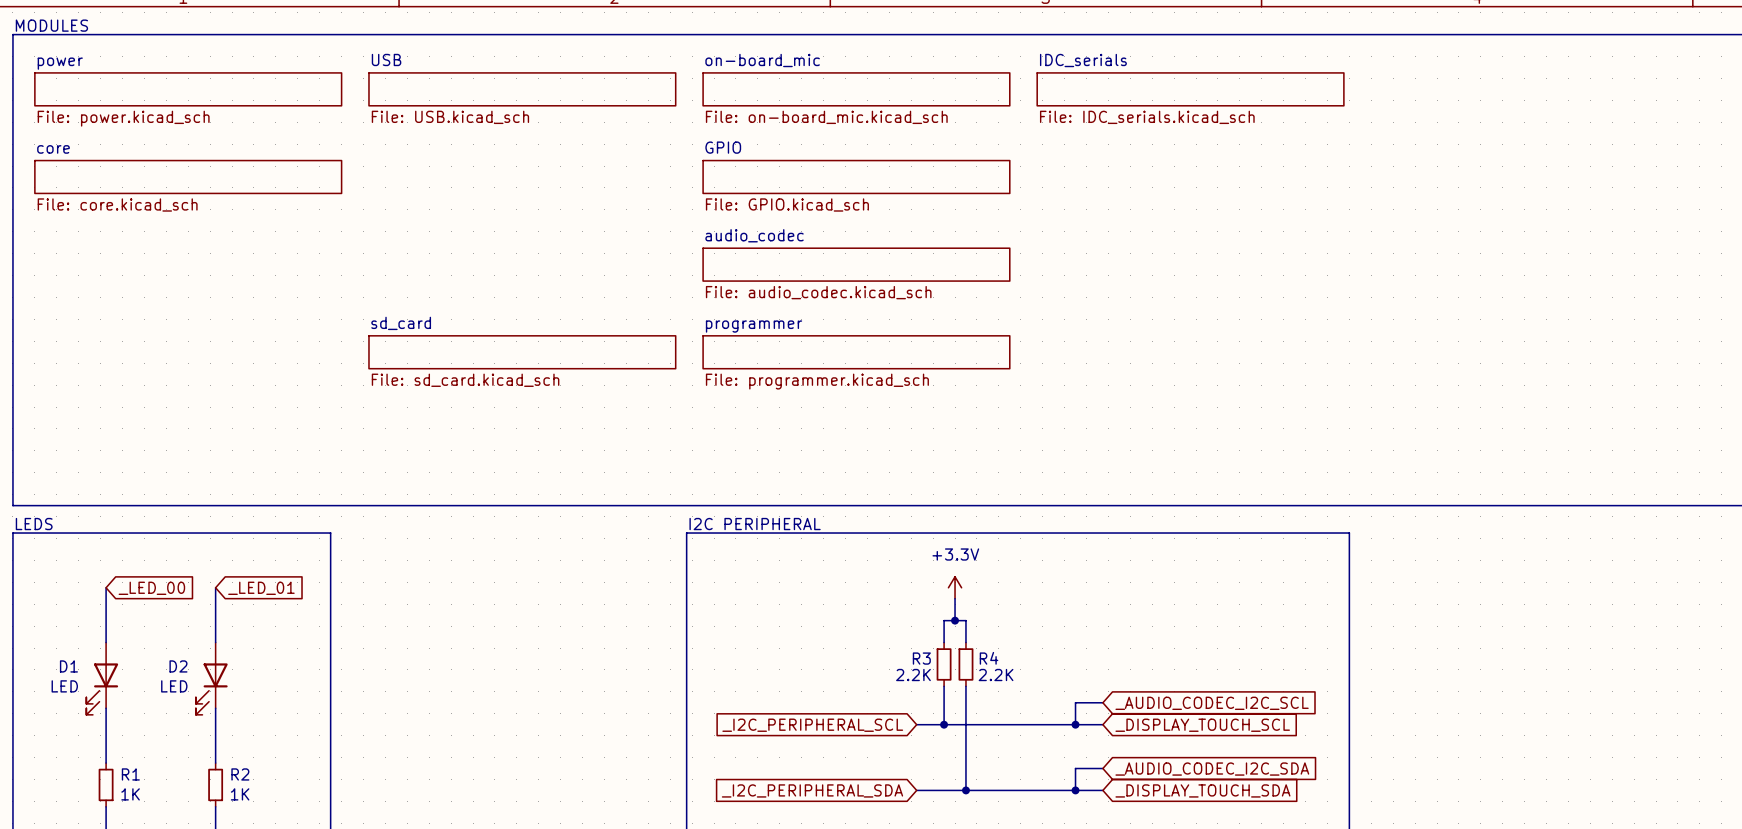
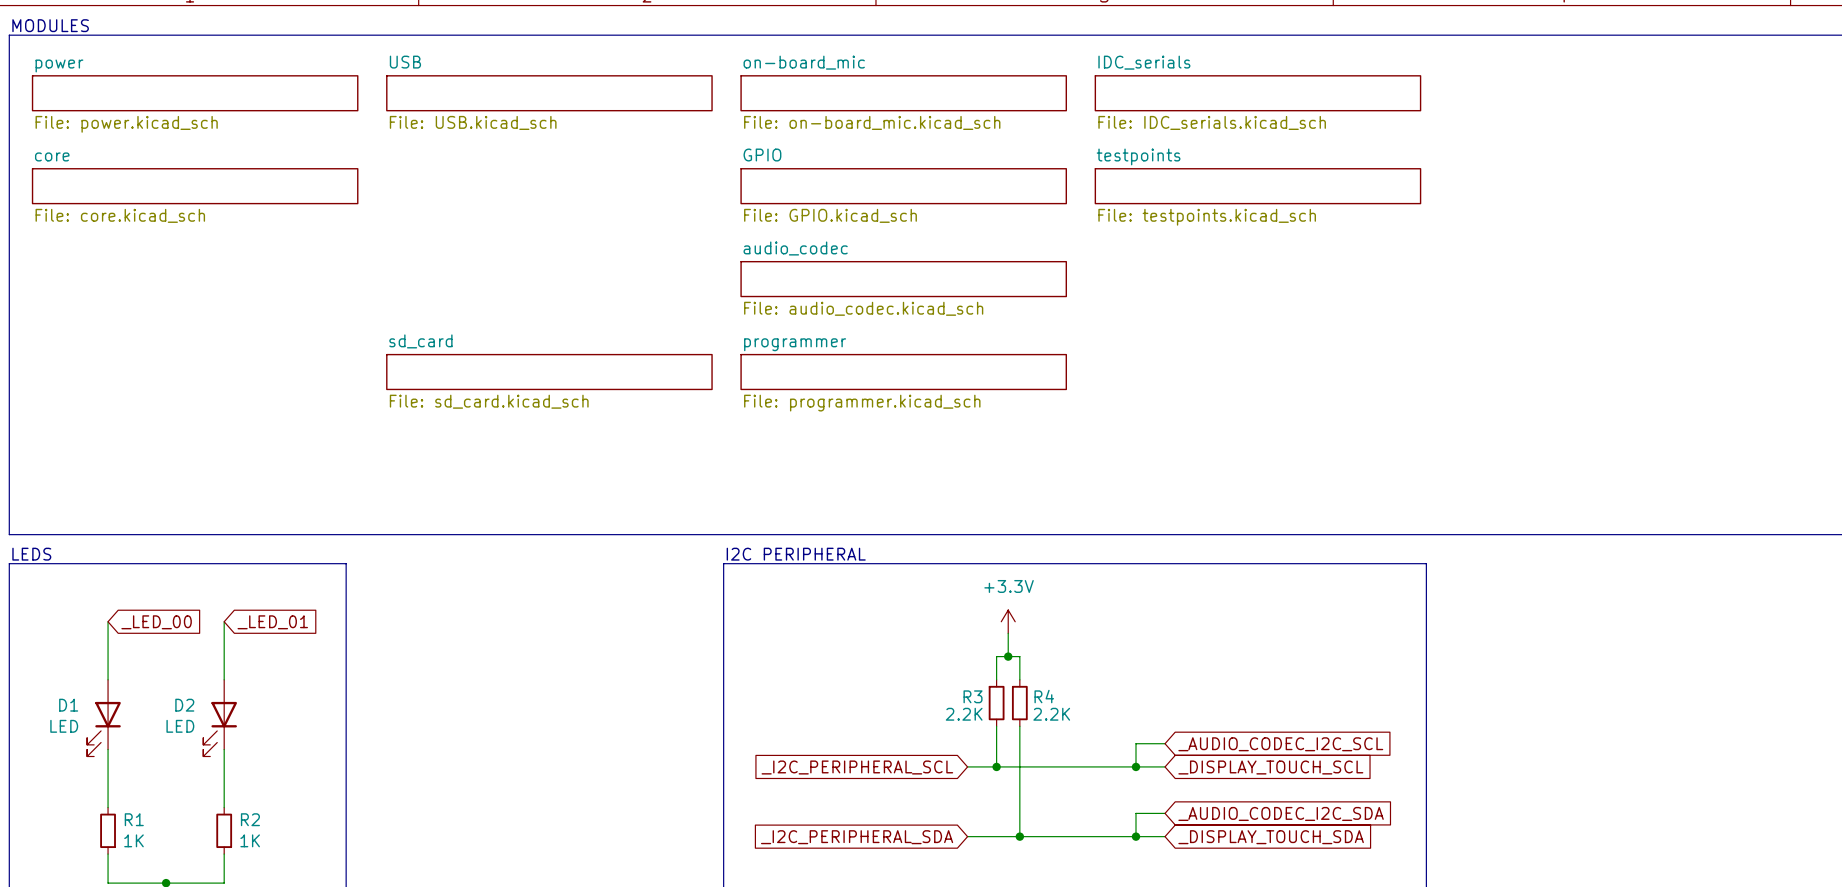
sheet testpoints: none -> File: testpoints.kicad_sch (1257, 186)

